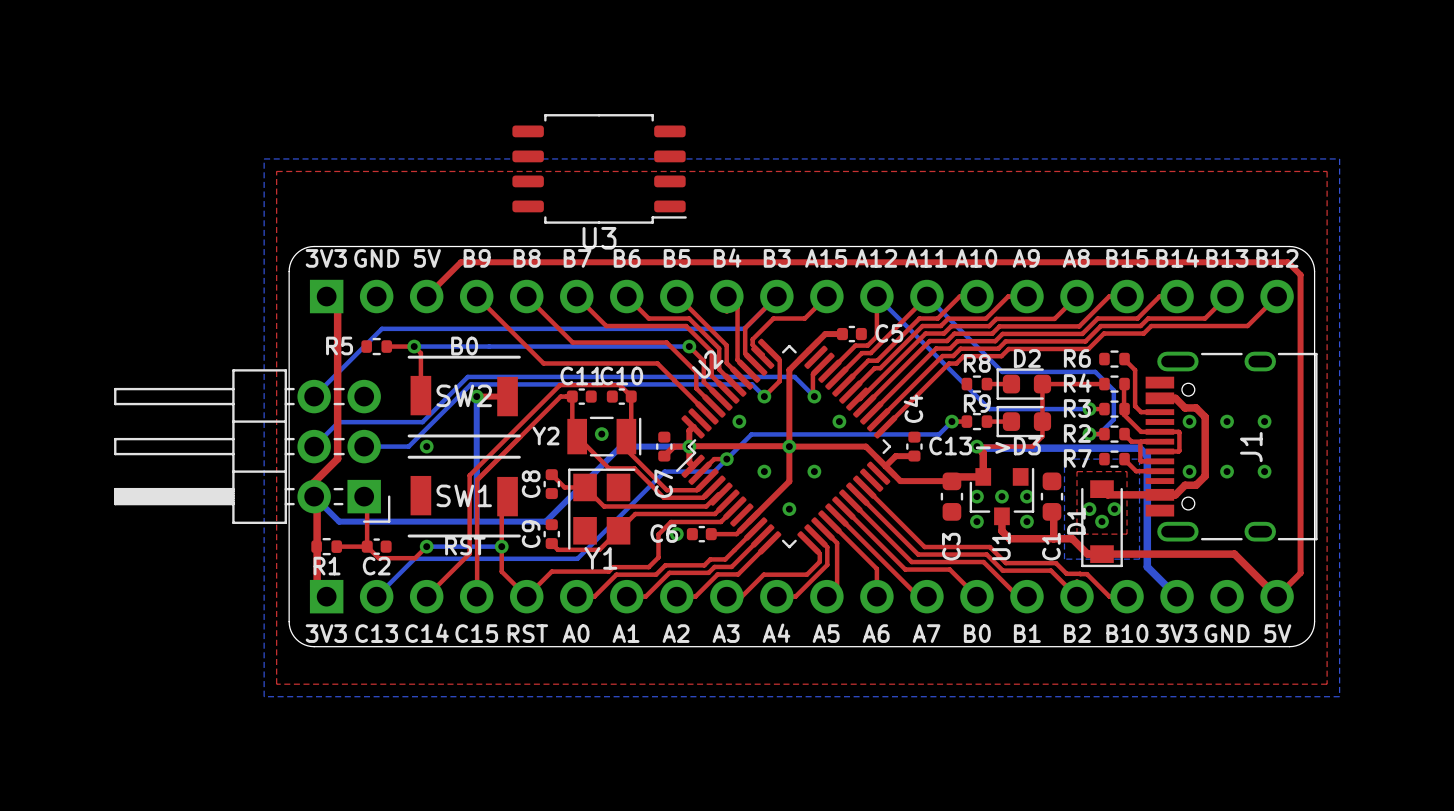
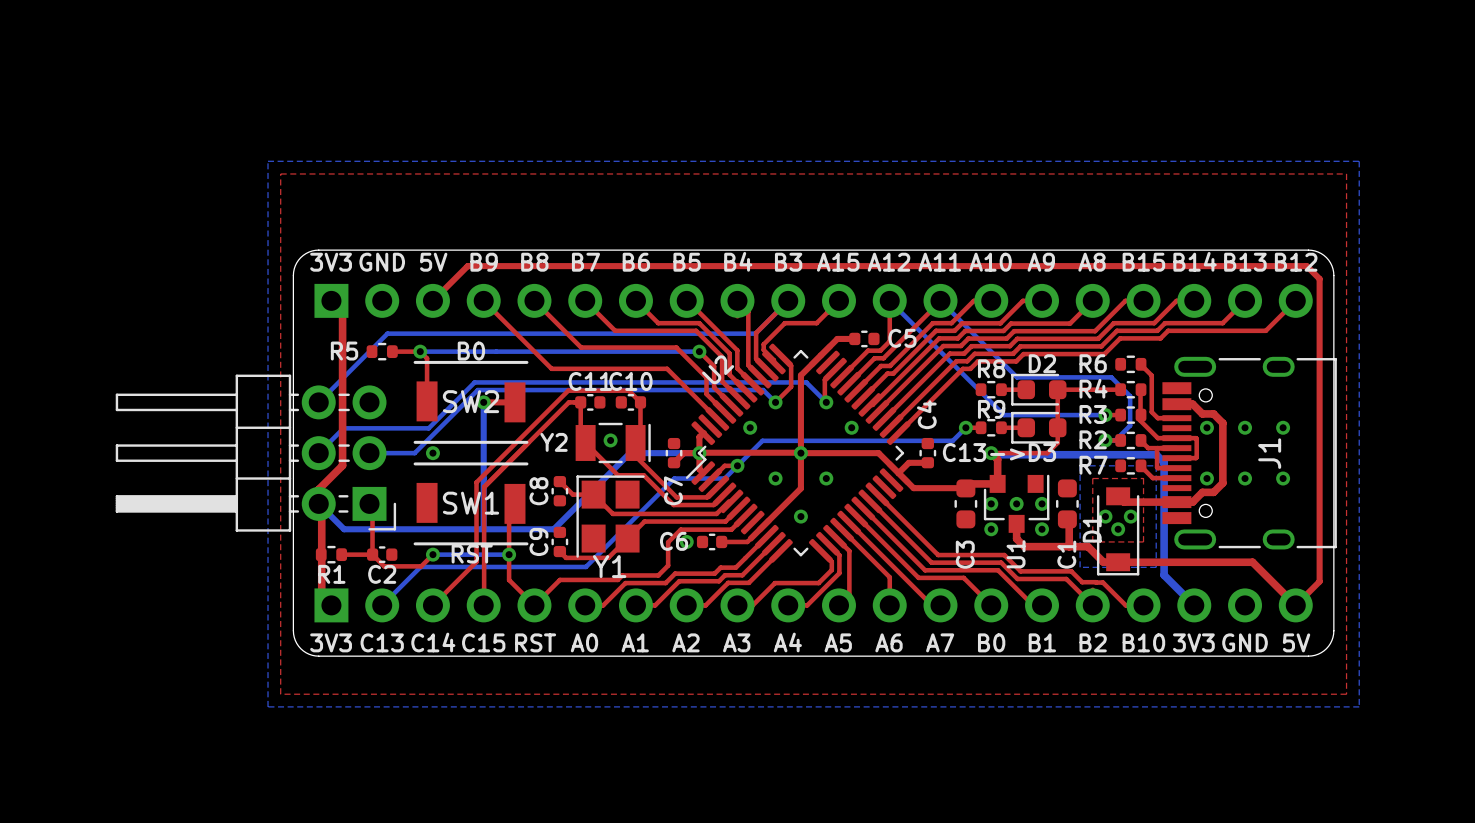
U3: (599, 168) -> none

